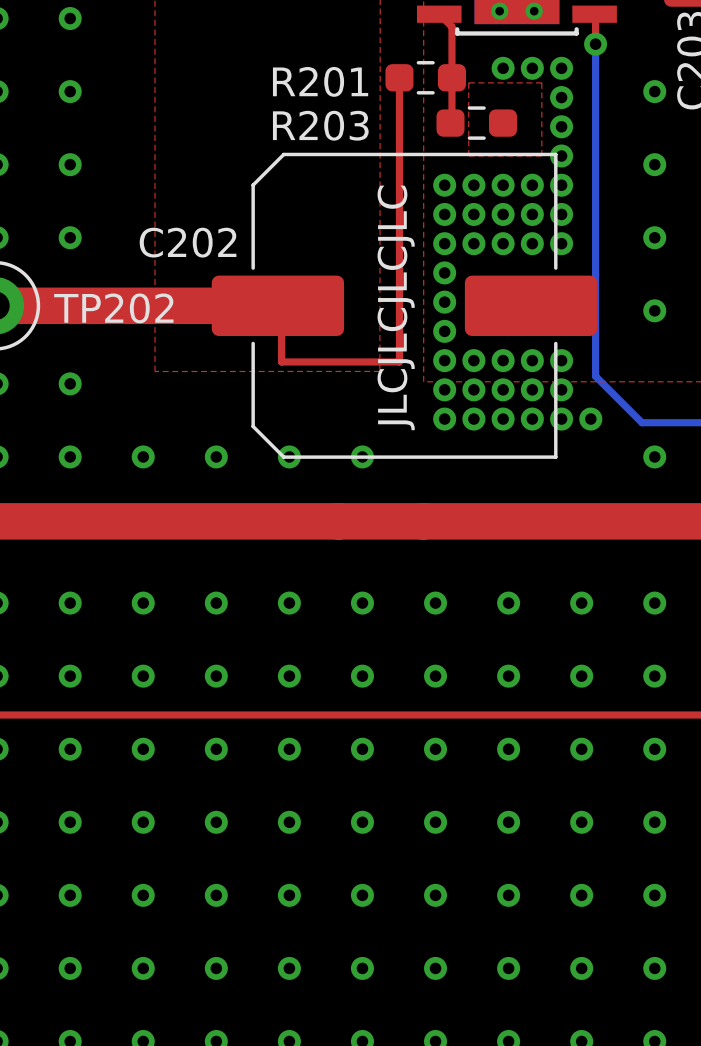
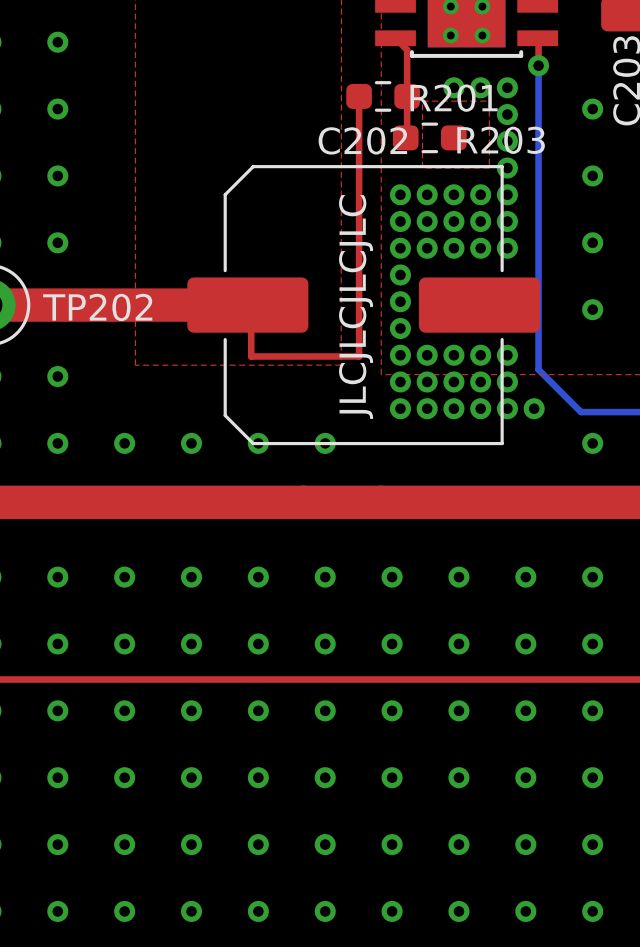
R201 name position: R201 (320, 81) -> R201 (454, 98)
R203 name position: R203 (320, 125) -> R203 (501, 140)
C202 name position: C202 (188, 242) -> C202 (362, 140)

